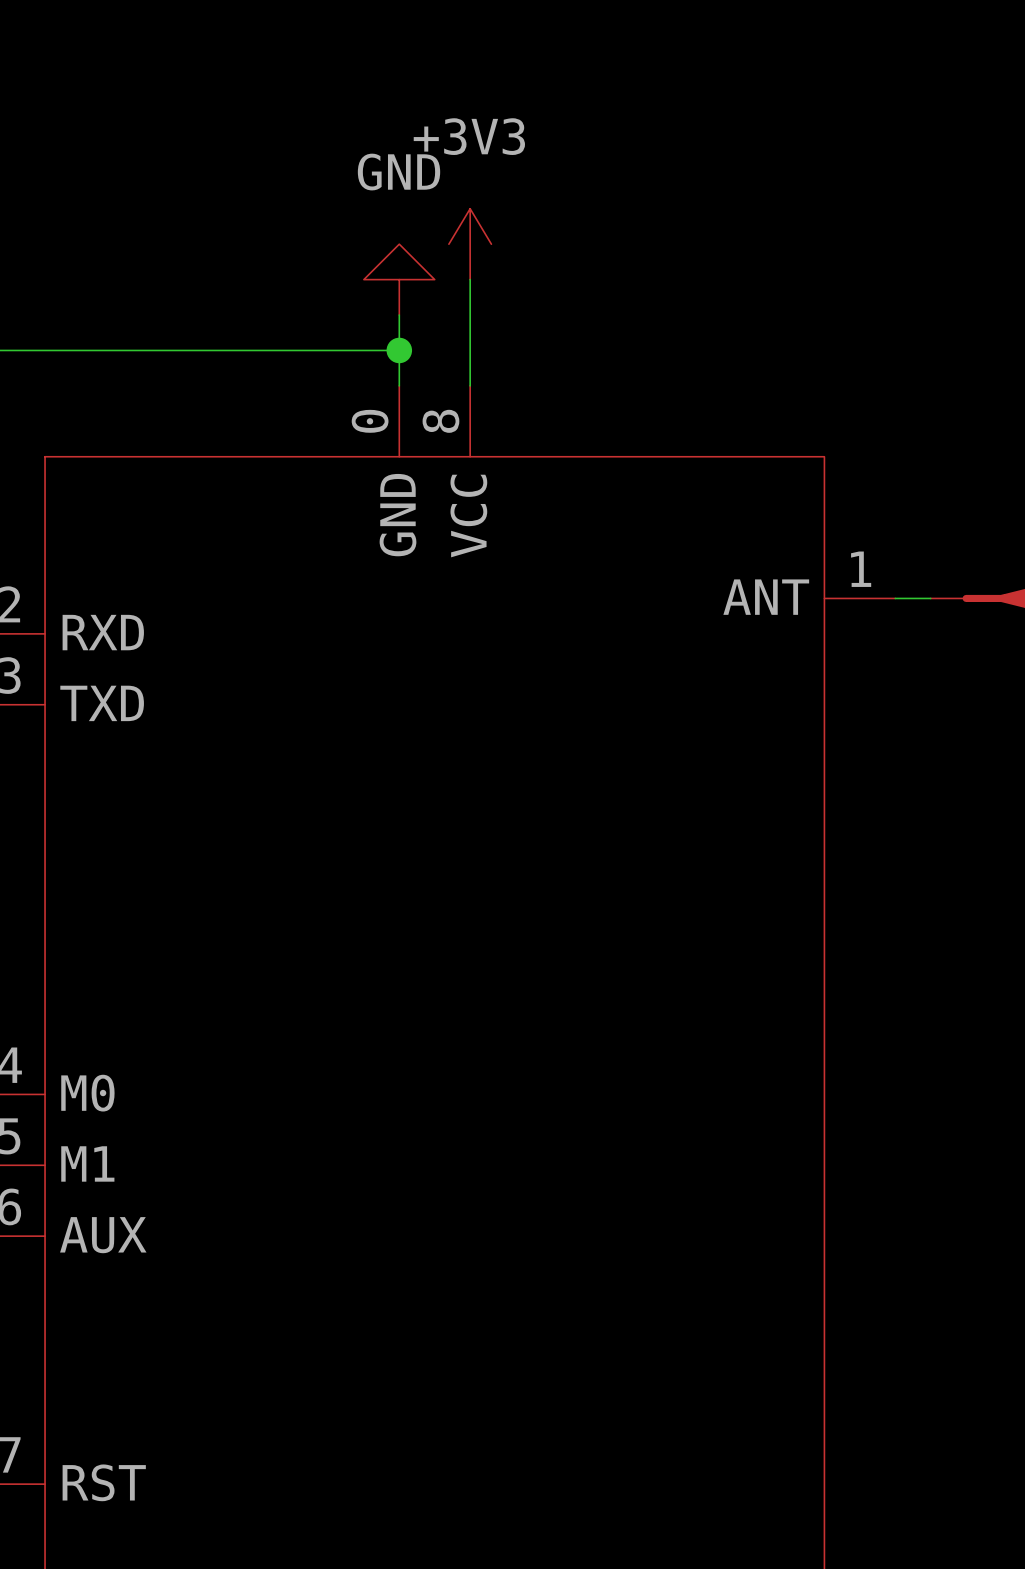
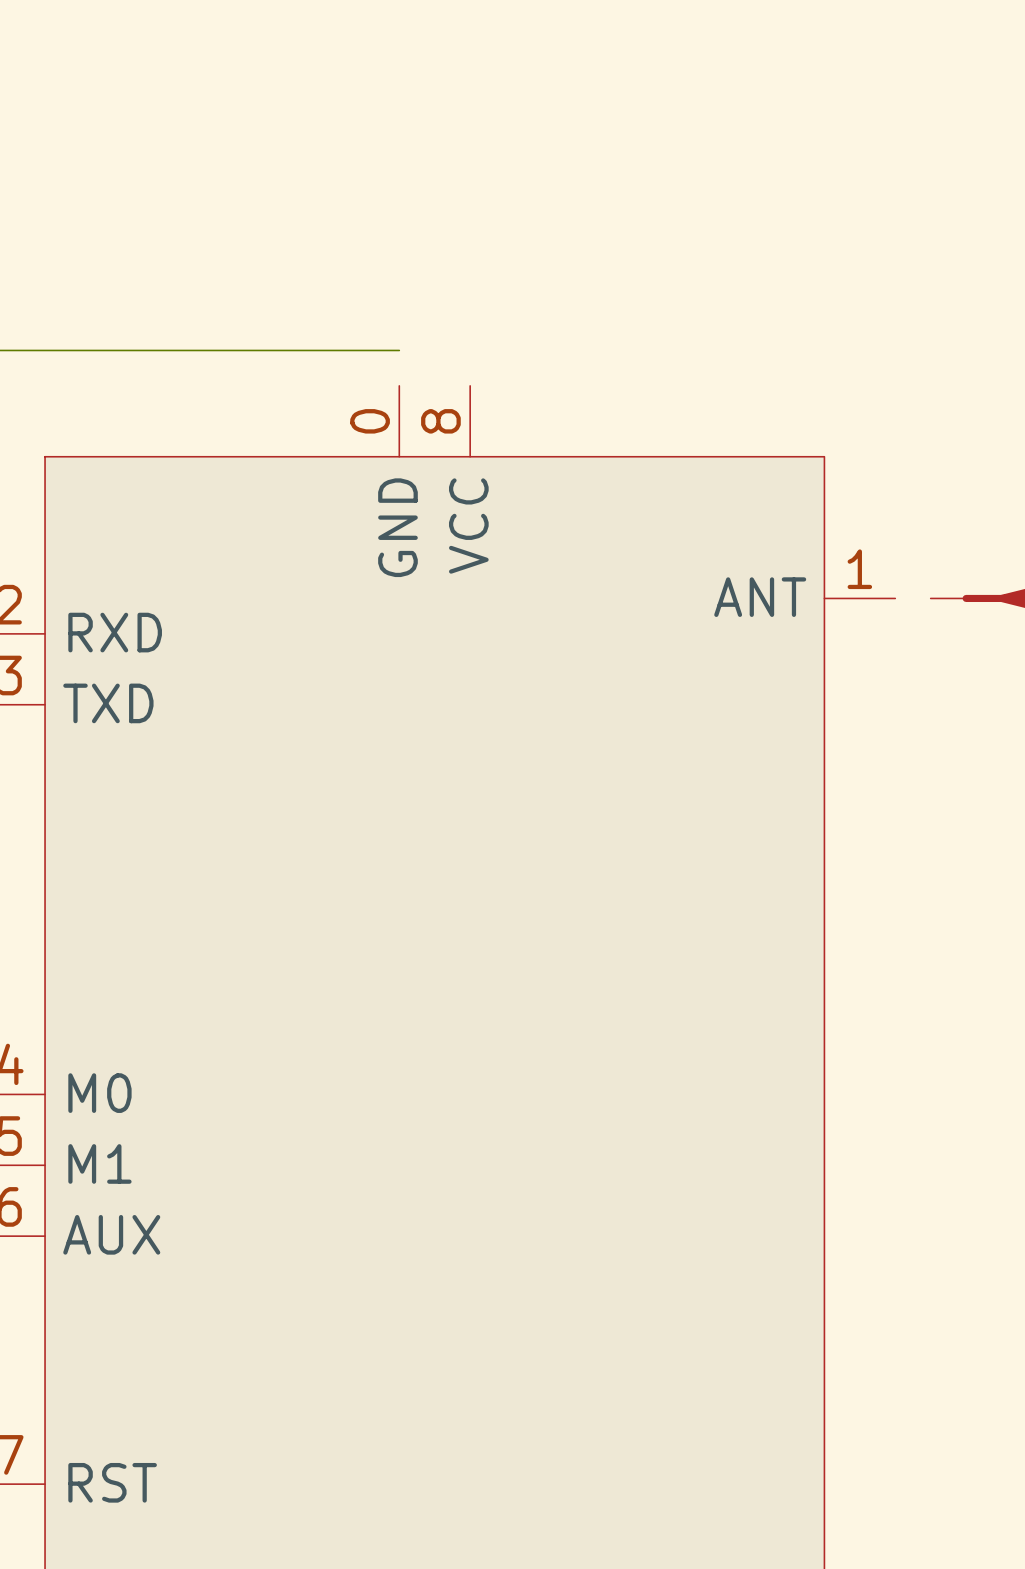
power symbol: +3V3 (470, 244) -> none
power symbol: GND (399, 279) -> none
wire: (470, 279) (470, 385) -> none
wire: (399, 315) (399, 385) -> none
junction: (399, 350) -> none
wire: (895, 598) (930, 598) -> none

